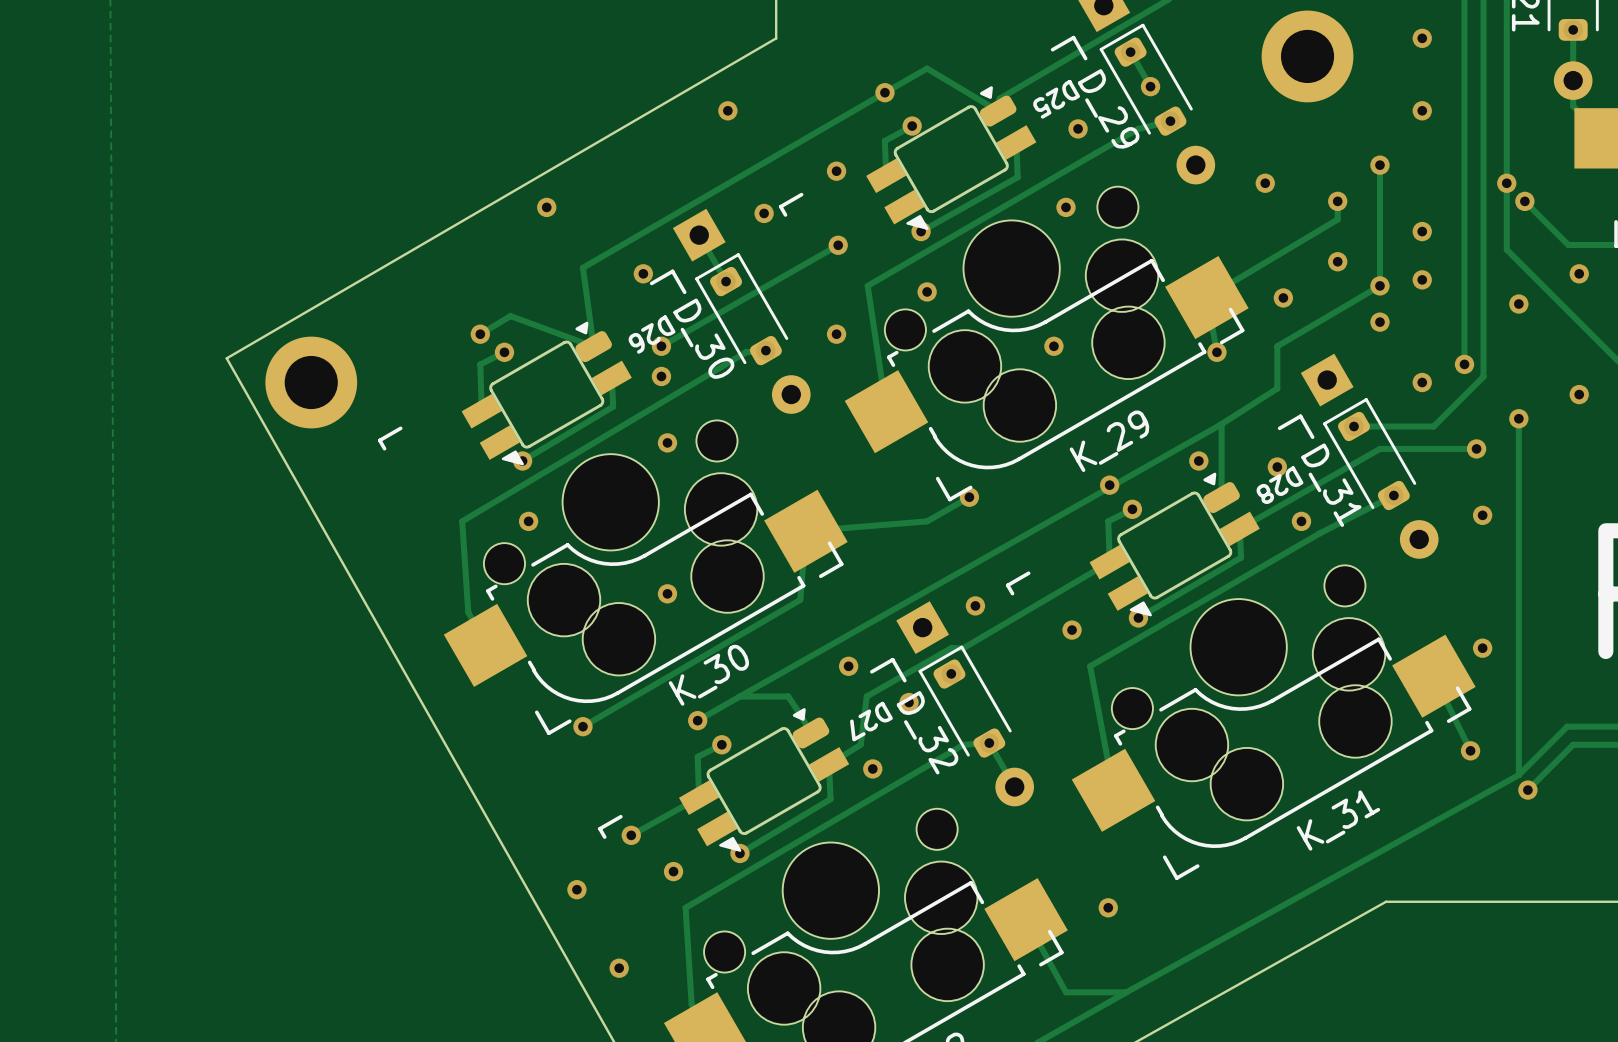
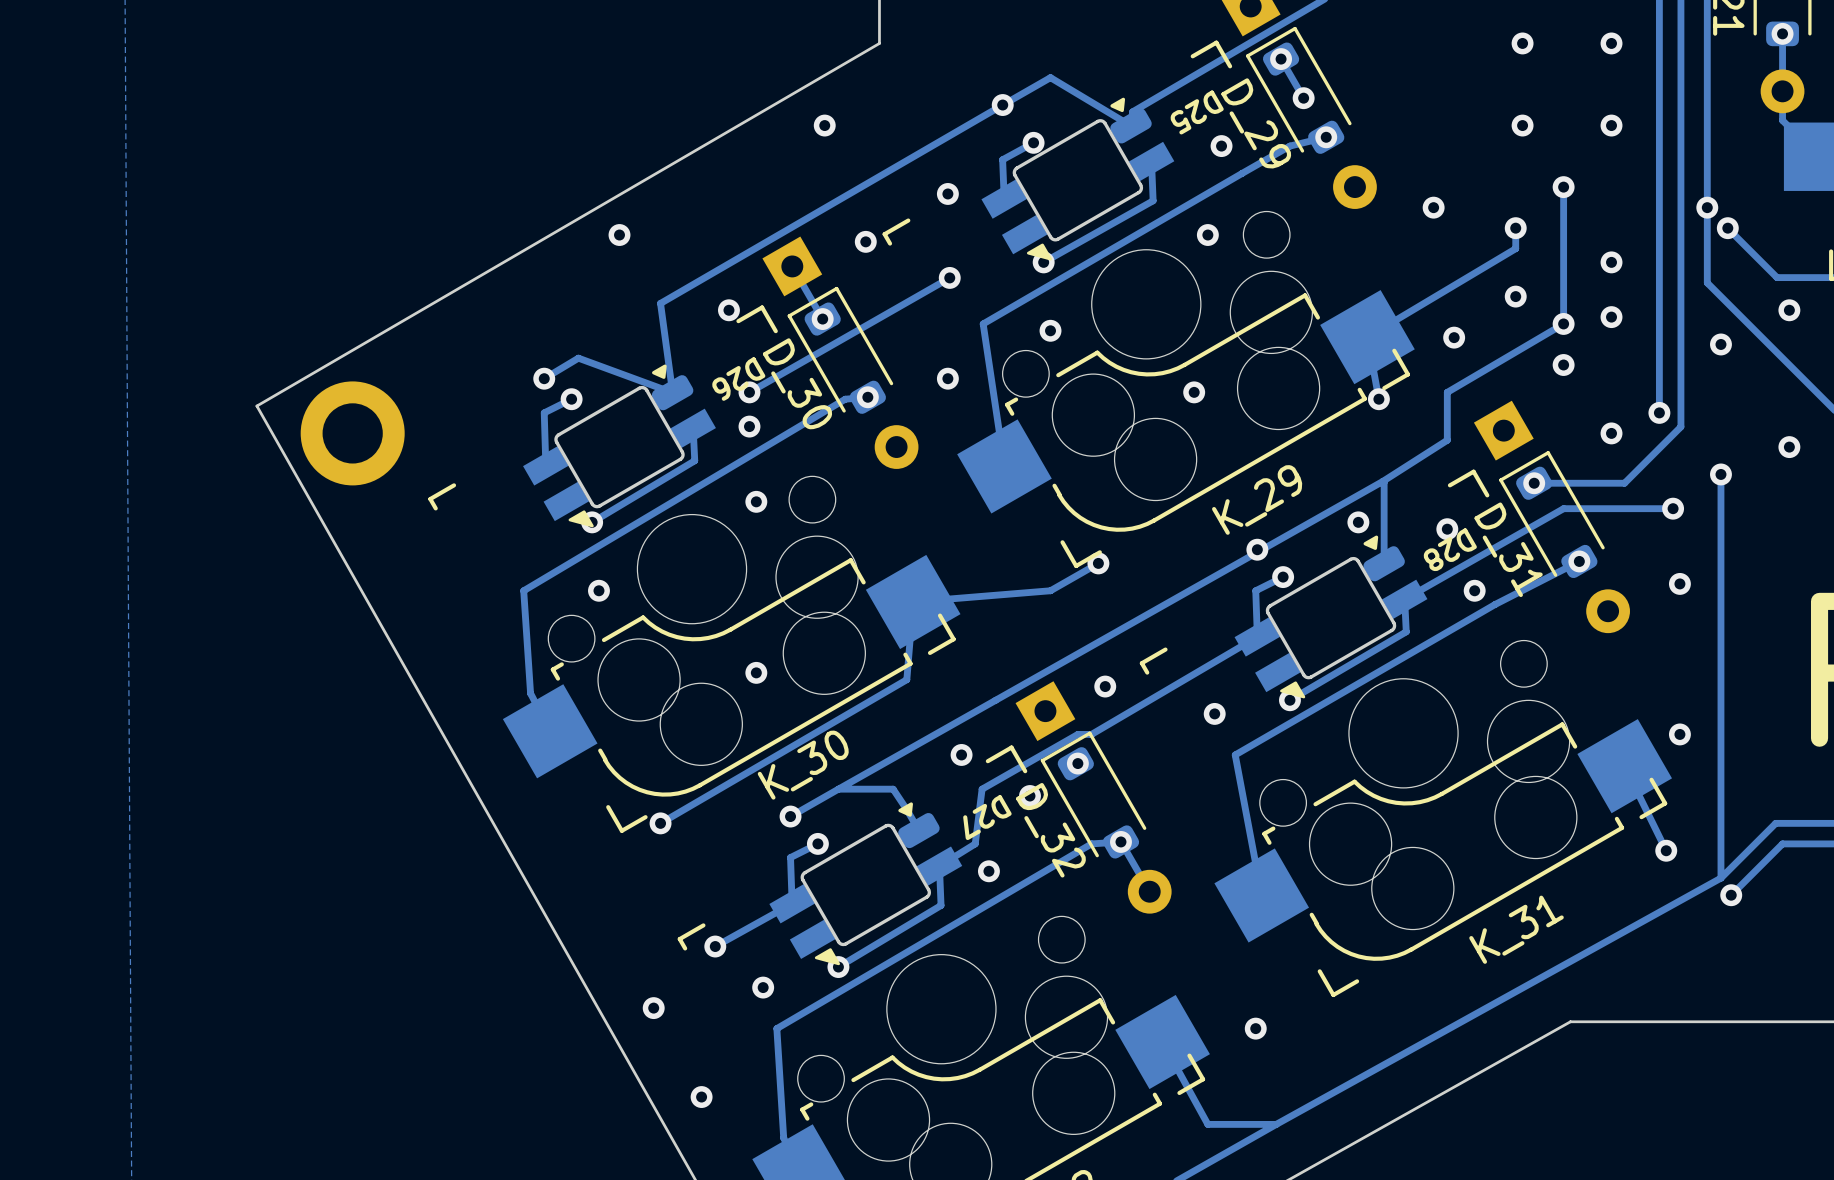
via: none -> (1522, 43)
part: (1307, 56) -> none
via: none -> (1522, 125)

